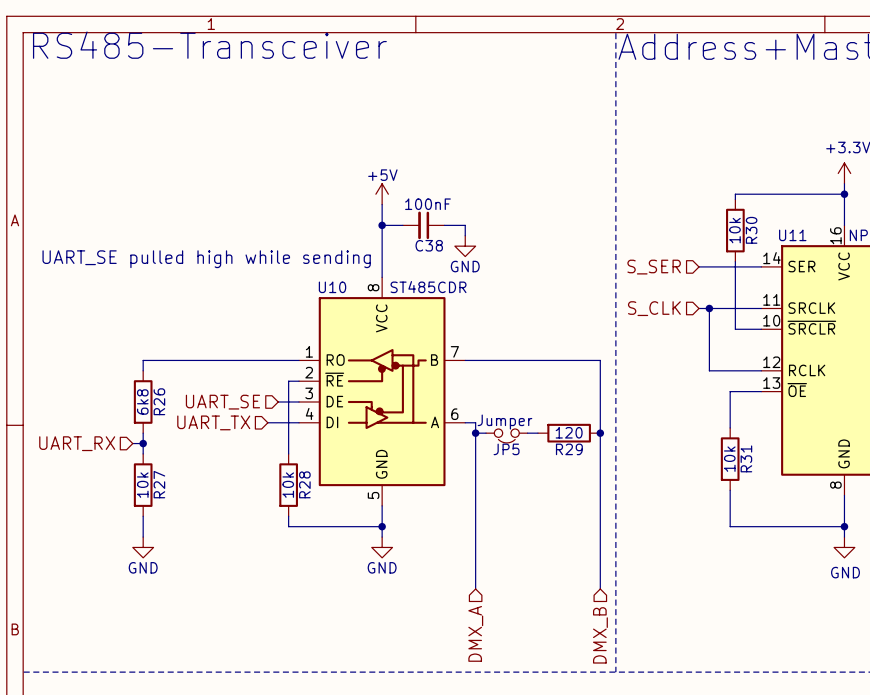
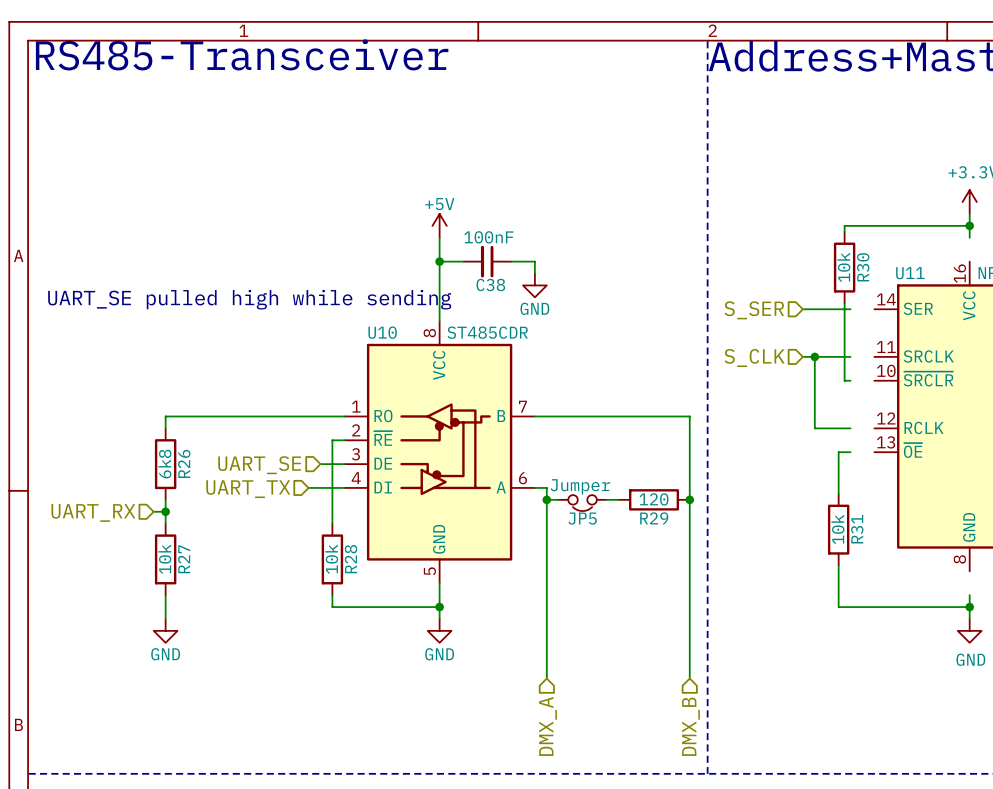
wire: (844, 204) (844, 225) -> none
wire: (740, 266) (761, 266) -> none
wire: (740, 308) (761, 308) -> none
wire: (740, 329) (761, 329) -> none
wire: (740, 370) (761, 370) -> none
wire: (740, 391) (761, 391) -> none
wire: (844, 495) (844, 516) -> none

